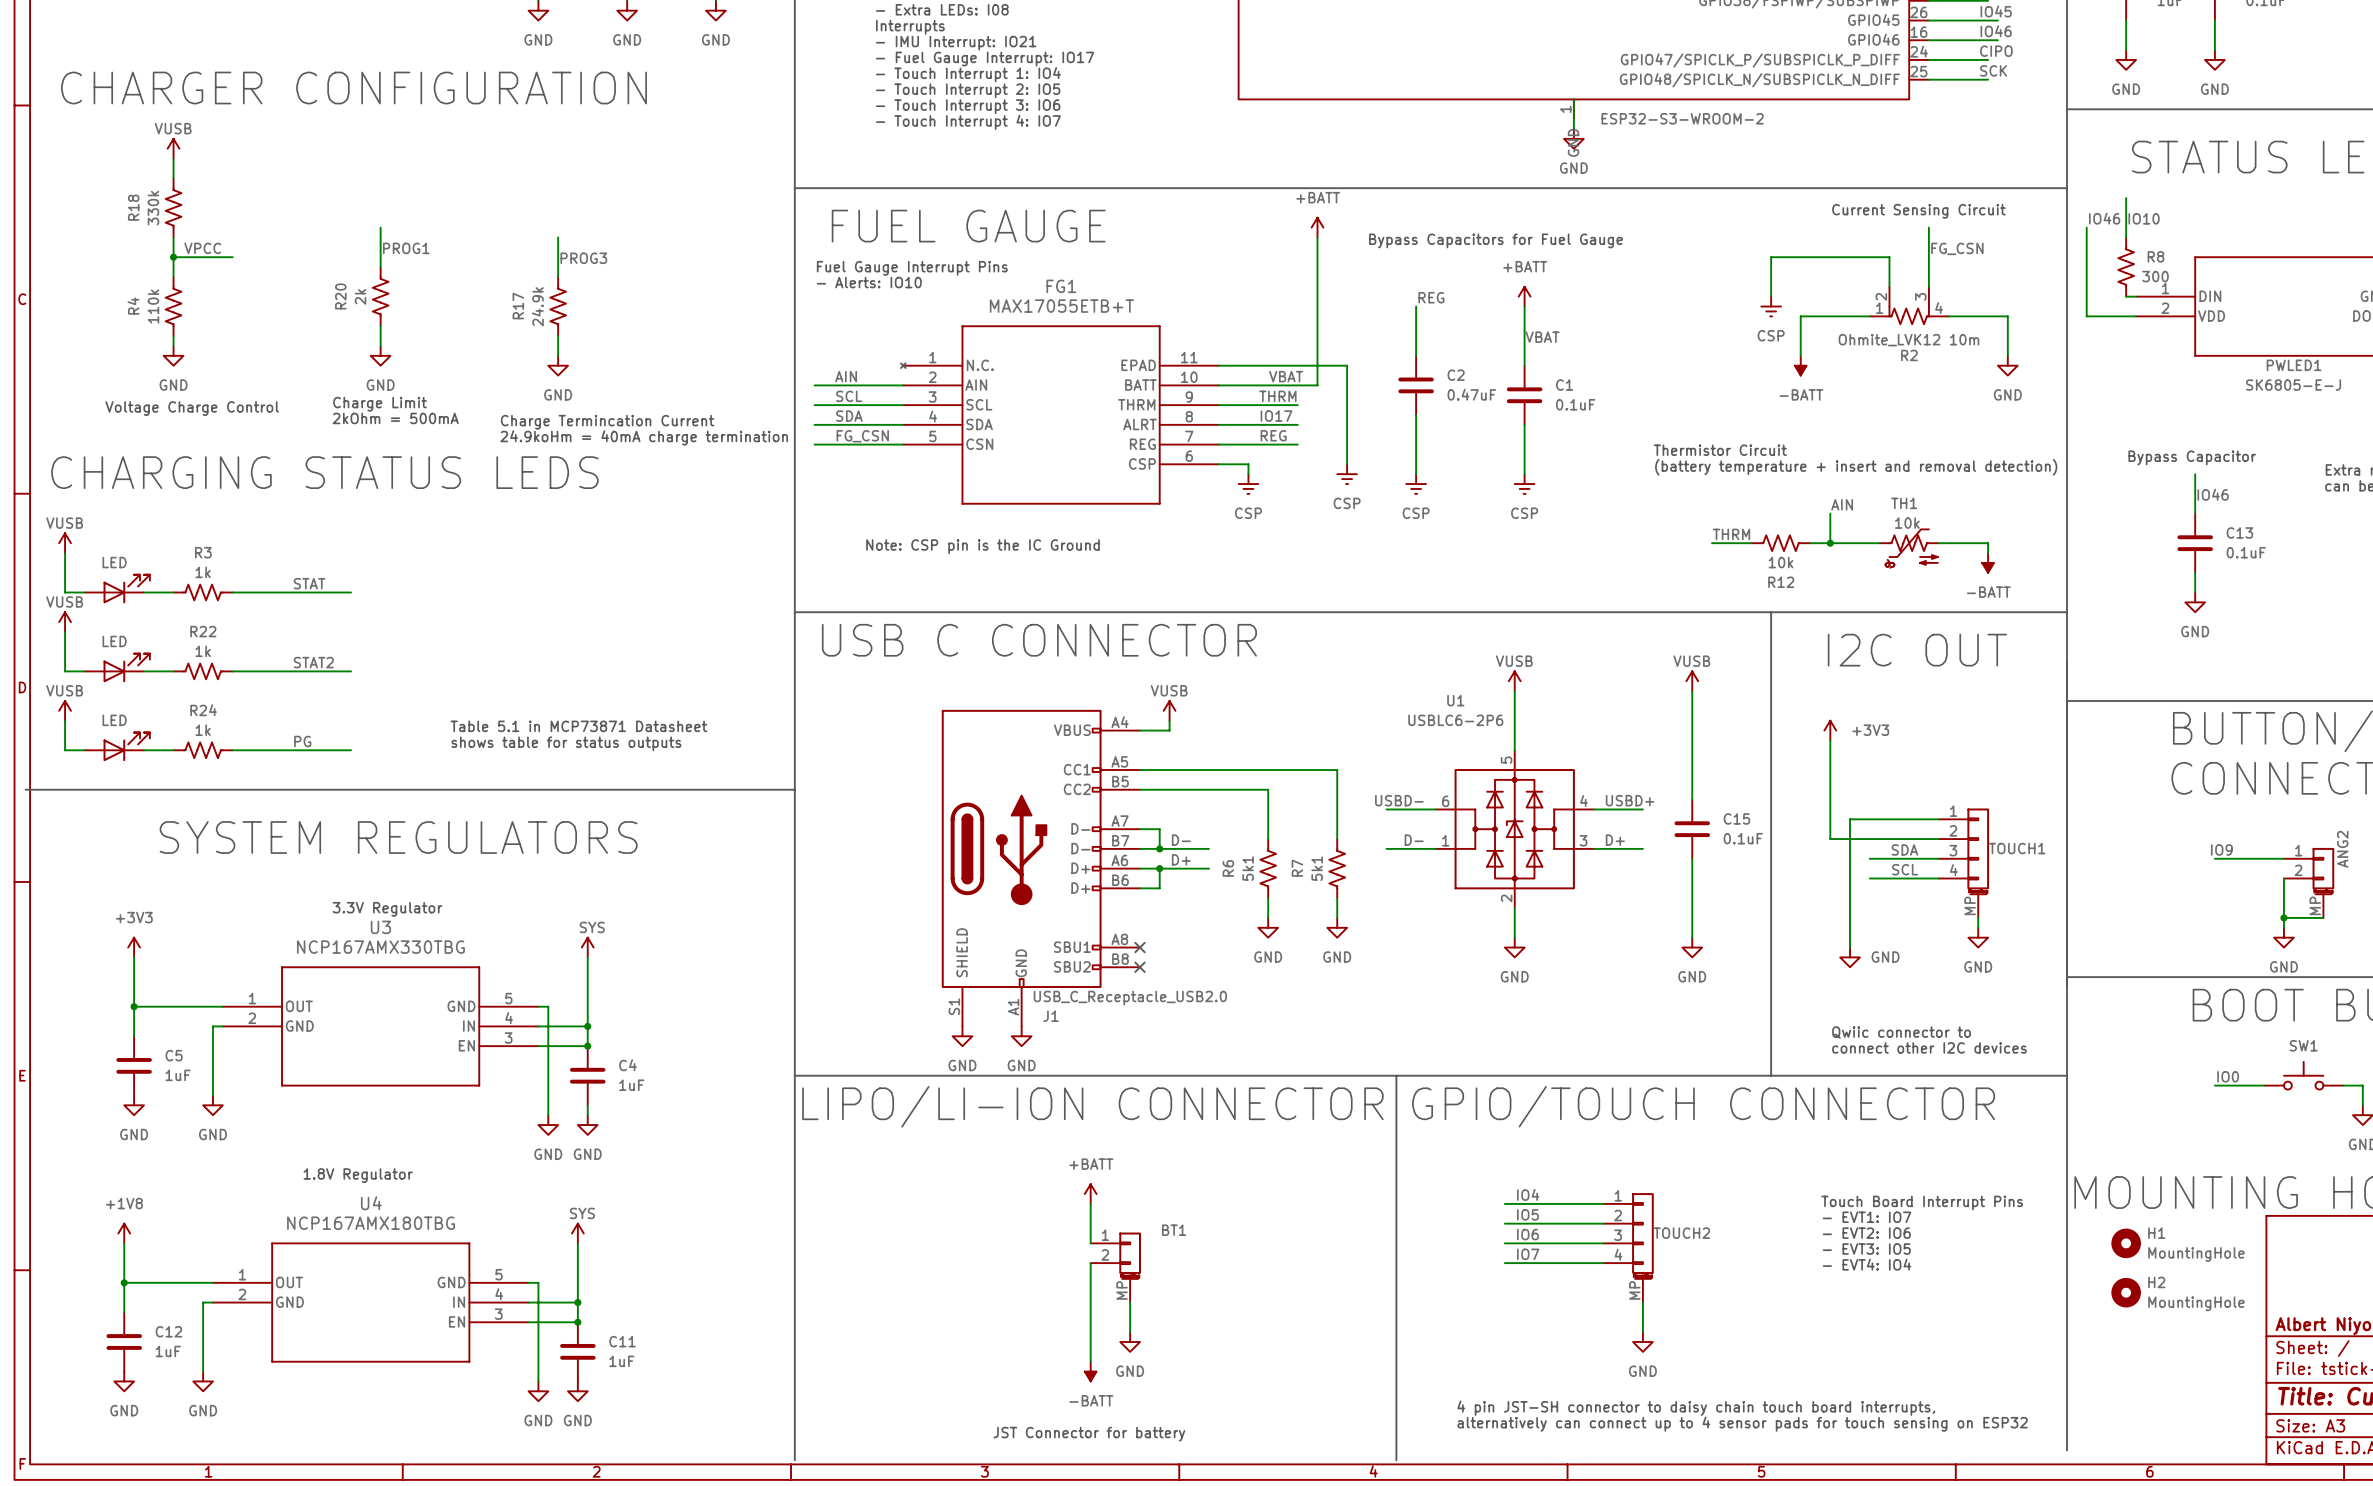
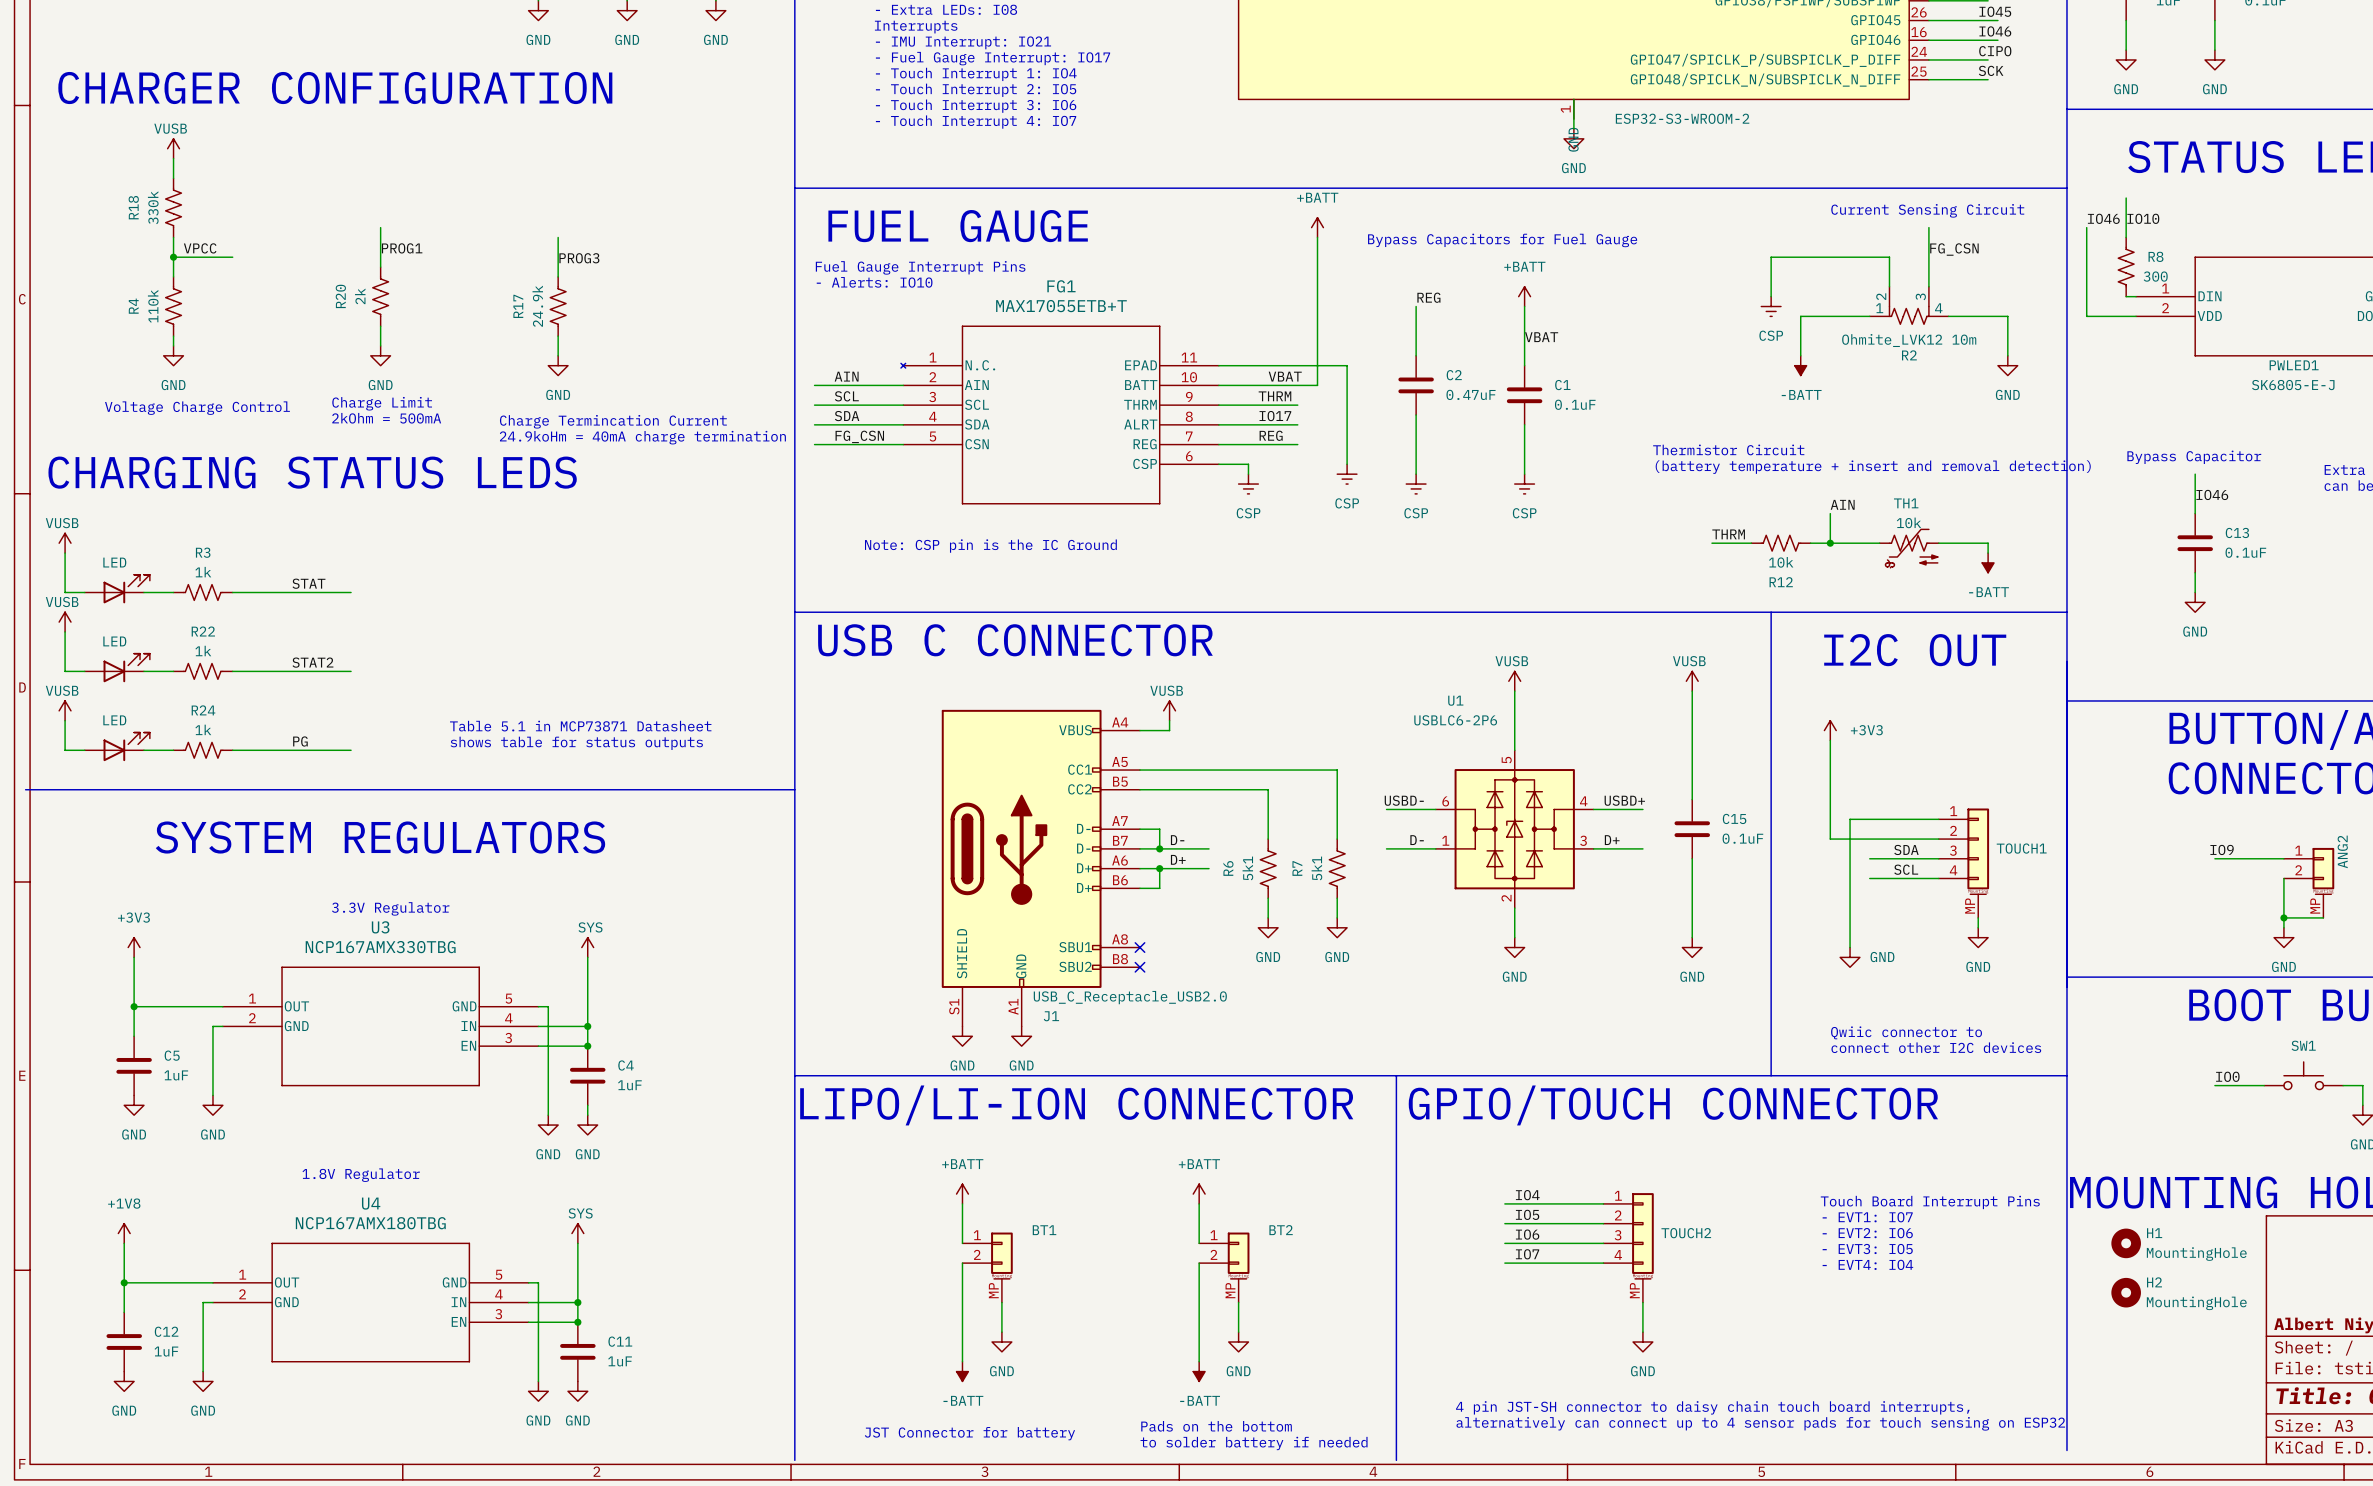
power symbol: none -> +BATT (962, 1194)
power symbol: +BATT (1090, 1194) -> none
power symbol: none -> +BATT (1199, 1194)
wire: none -> (962, 1203) (962, 1243)
wire: (1090, 1203) (1090, 1243) -> (1199, 1203) (1199, 1243)
wire: none -> (962, 1263) (962, 1361)
wire: (1090, 1263) (1090, 1361) -> (1199, 1263) (1199, 1361)
BT1 position: (1115, 1267) -> (987, 1267)
BT2: none -> (1224, 1267)
wire: none -> (1001, 1302) (1001, 1332)
wire: (1130, 1302) (1130, 1332) -> (1238, 1302) (1238, 1332)
power symbol: none -> GND (1001, 1342)
power symbol: GND (1130, 1342) -> none
power symbol: none -> GND (1238, 1342)
power symbol: none -> -BATT (962, 1371)
power symbol: -BATT (1090, 1371) -> none
power symbol: none -> -BATT (1199, 1371)
text: none -> Pads on the bottom (1216, 1426)
text position: JST Connector for battery (1089, 1434) -> JST Connector for battery (969, 1433)
text: none -> to solder battery if needed (1254, 1443)

